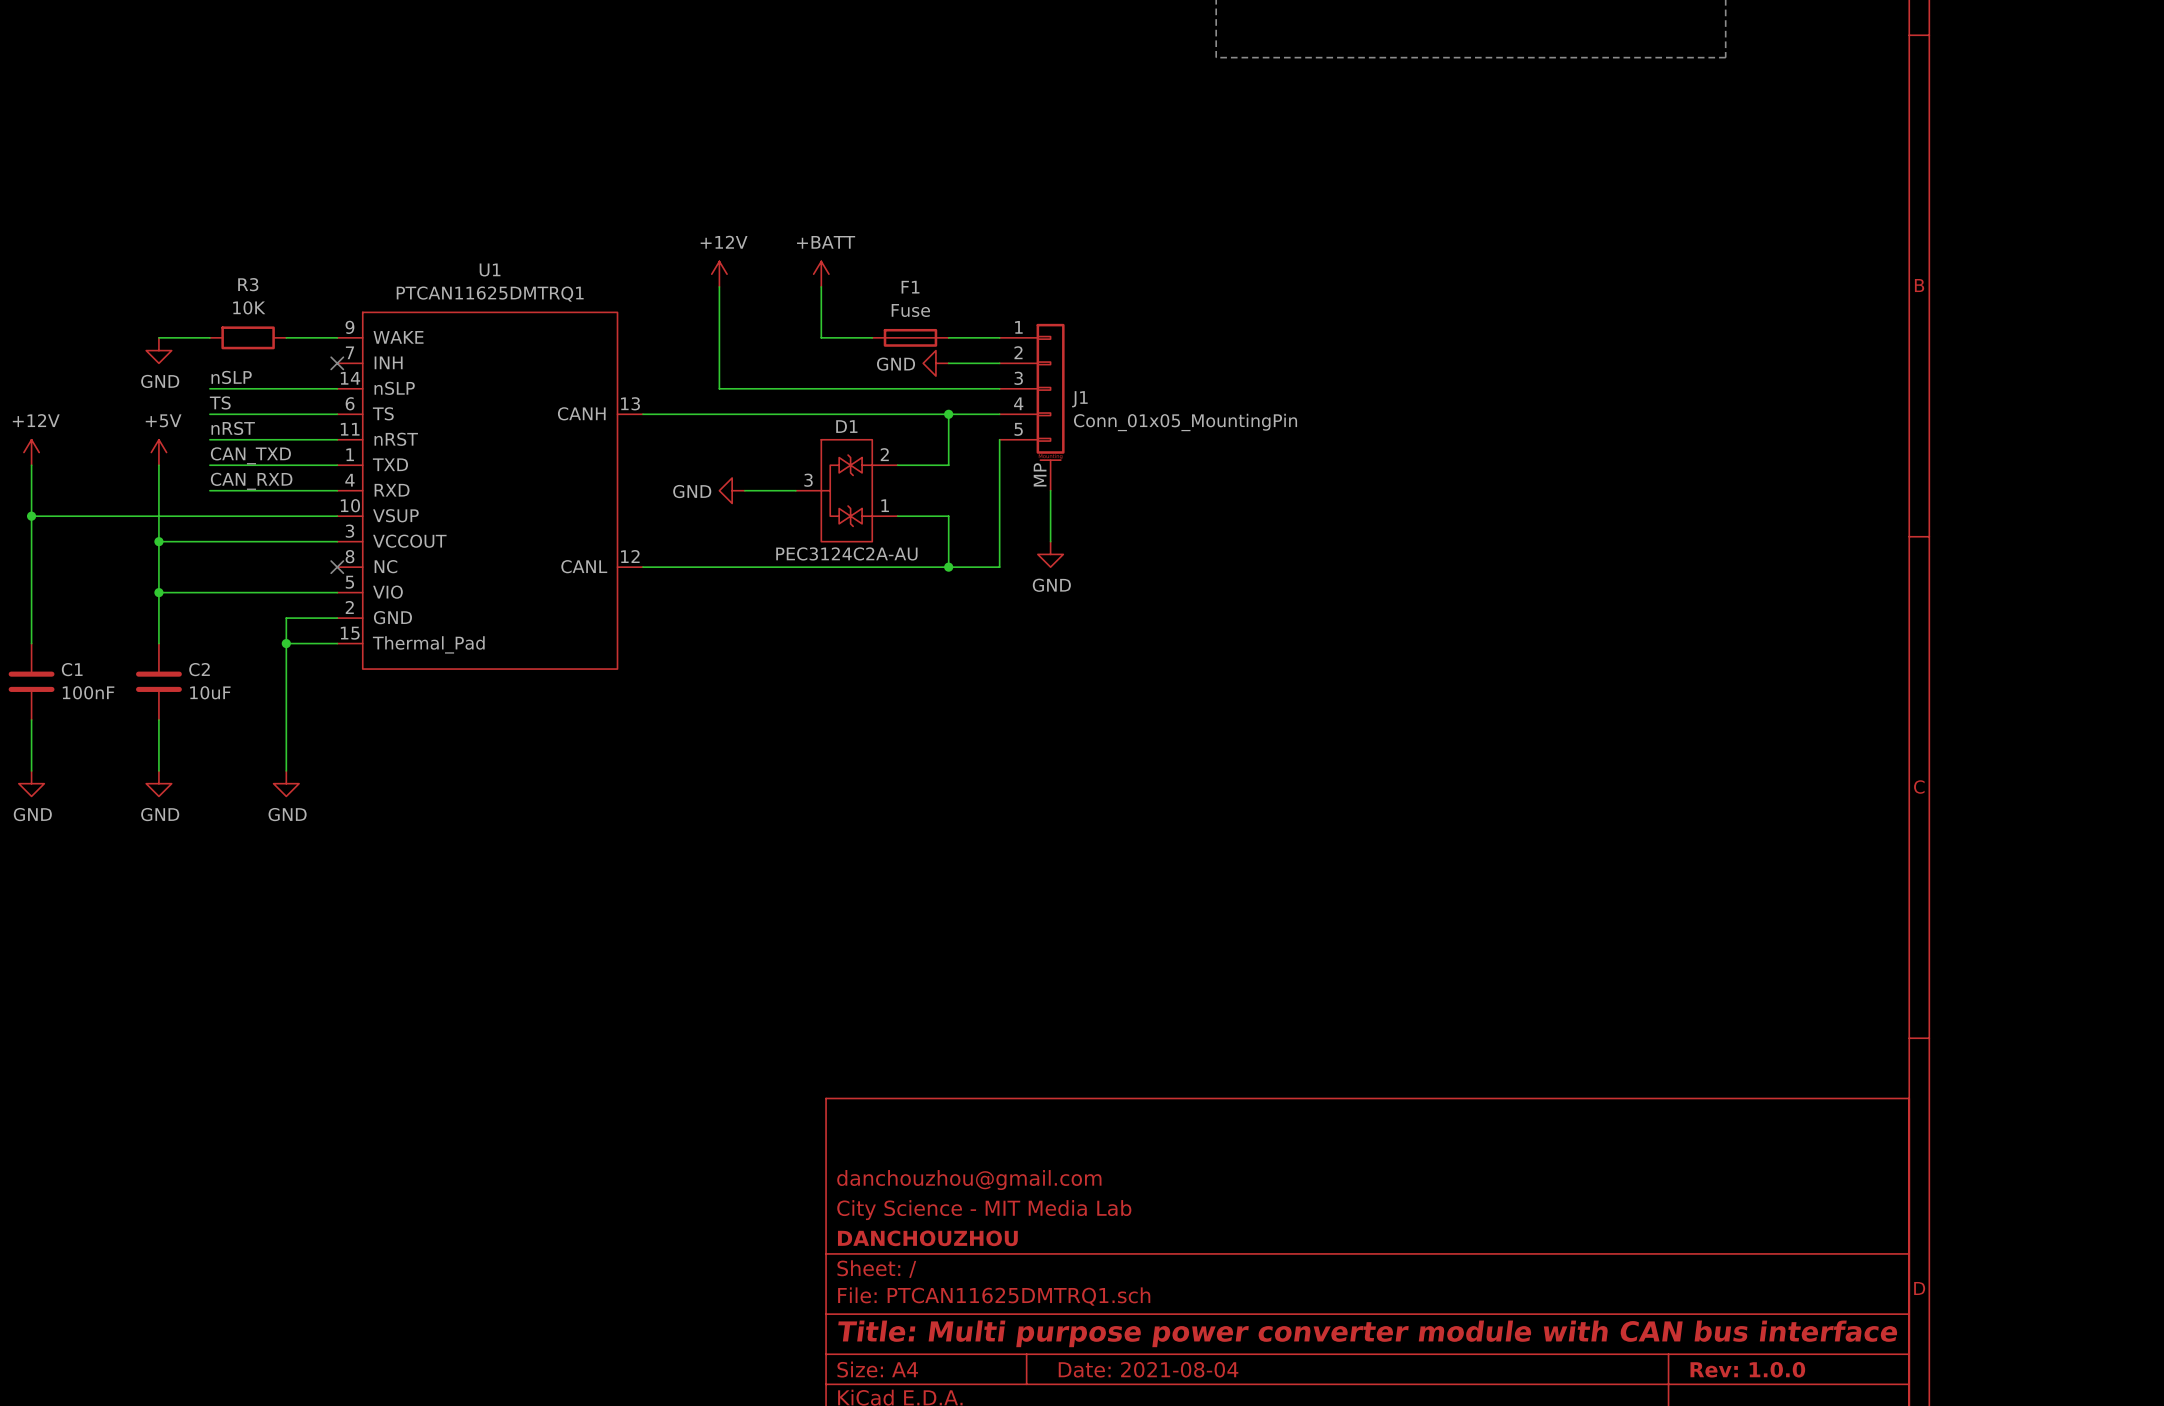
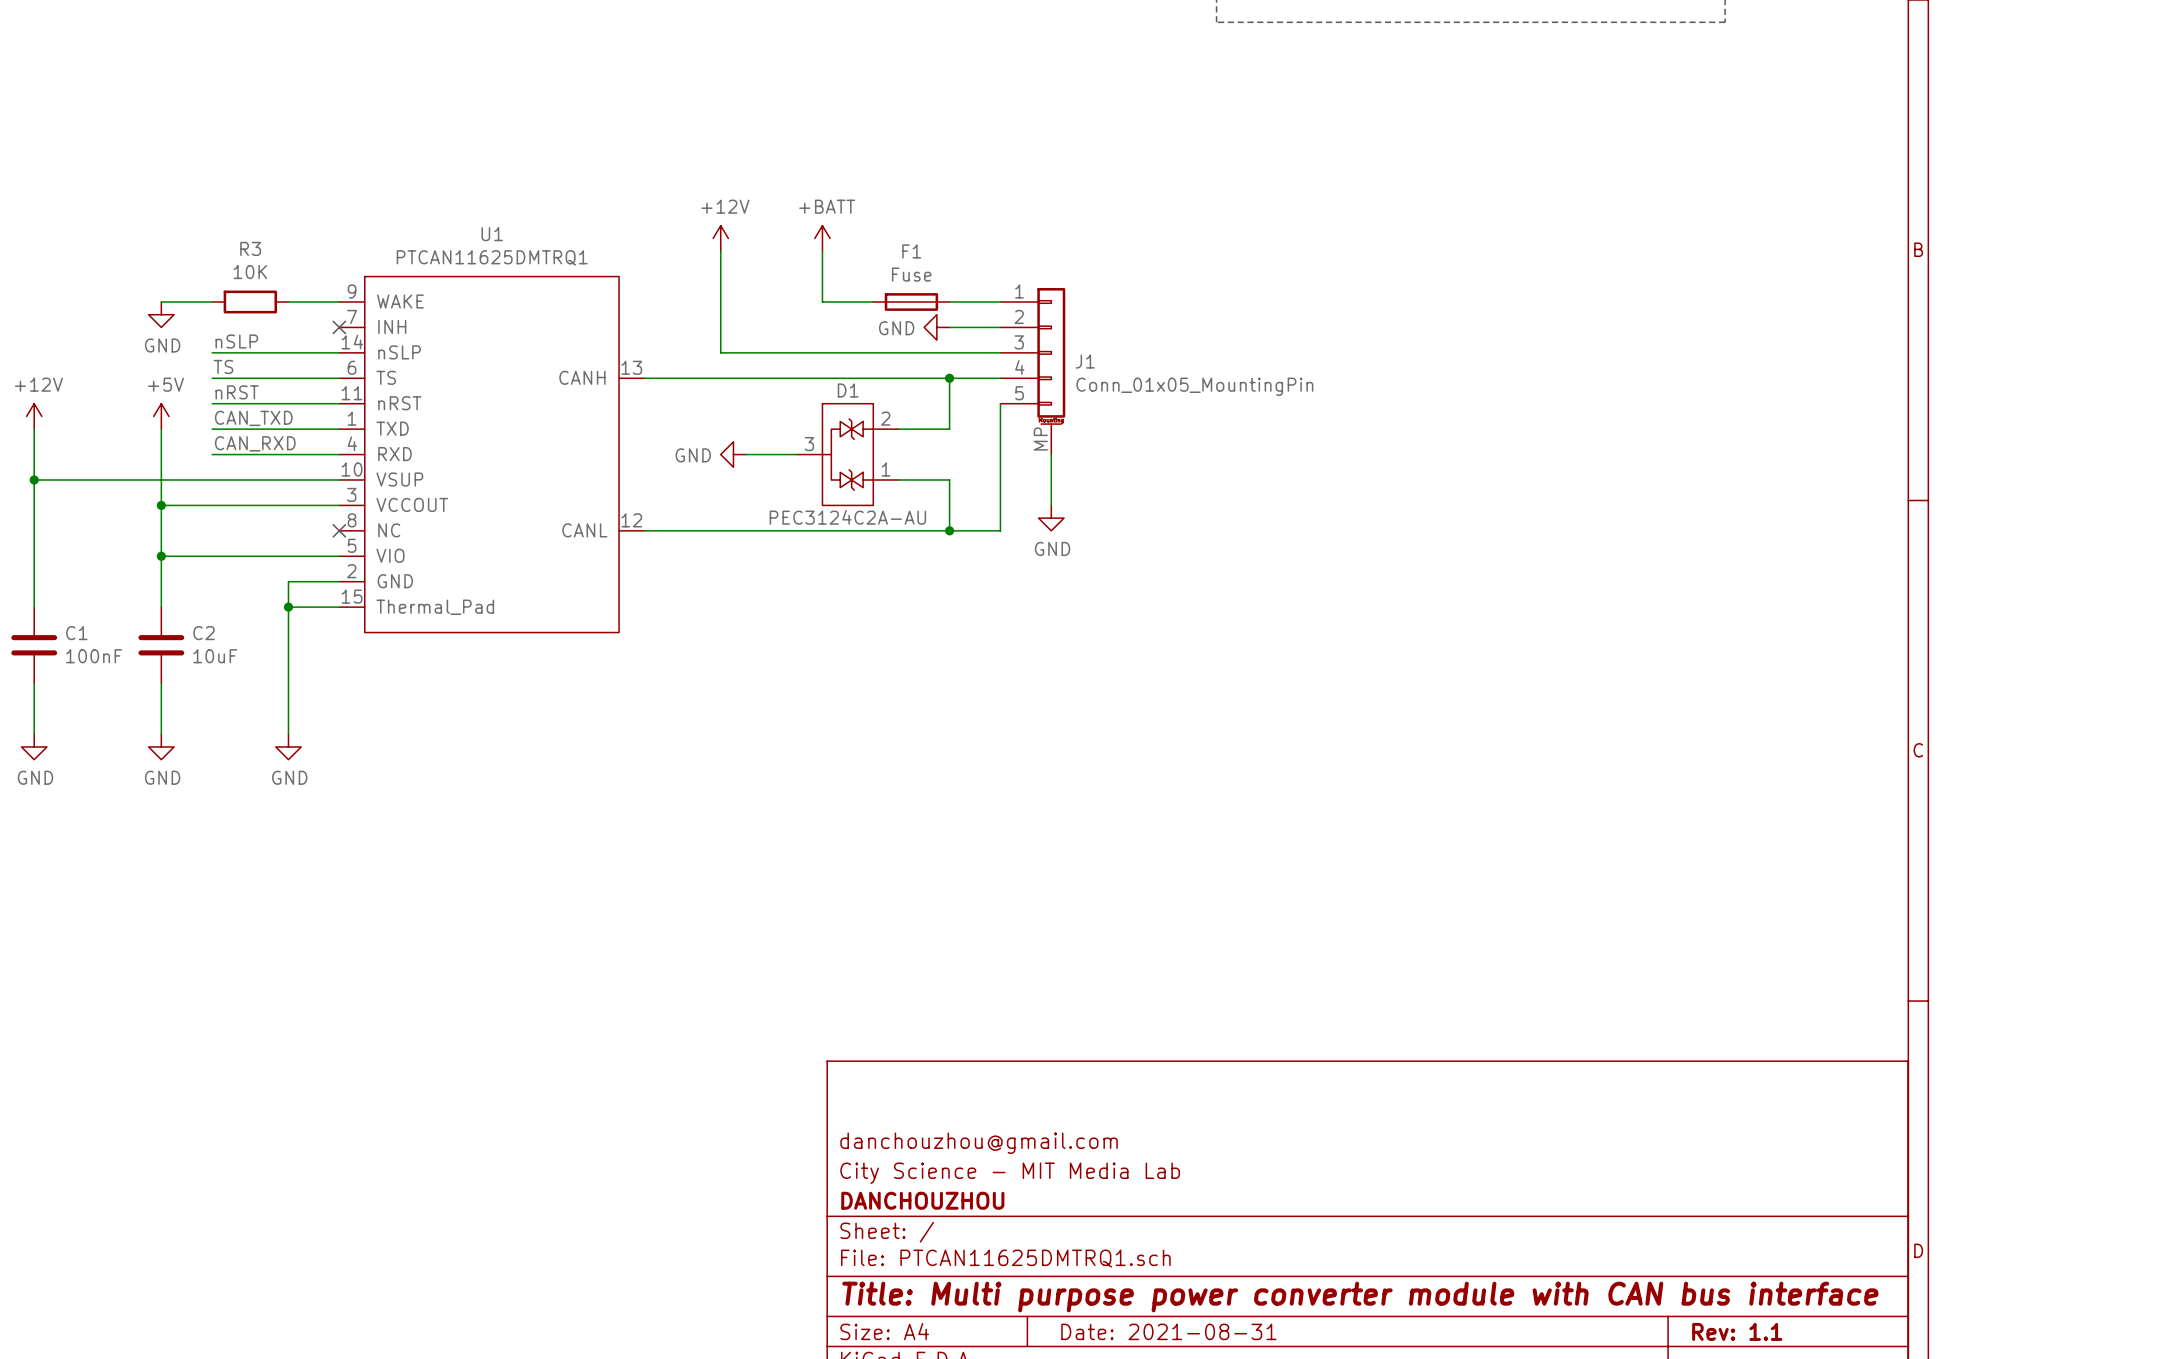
title block: Date: 2021-08-04 (1148, 1369) -> Date: 2021-08-31 (1168, 1331)
title block: Rev: 1.0.0 (1747, 1369) -> Rev: 1.1 (1737, 1331)

